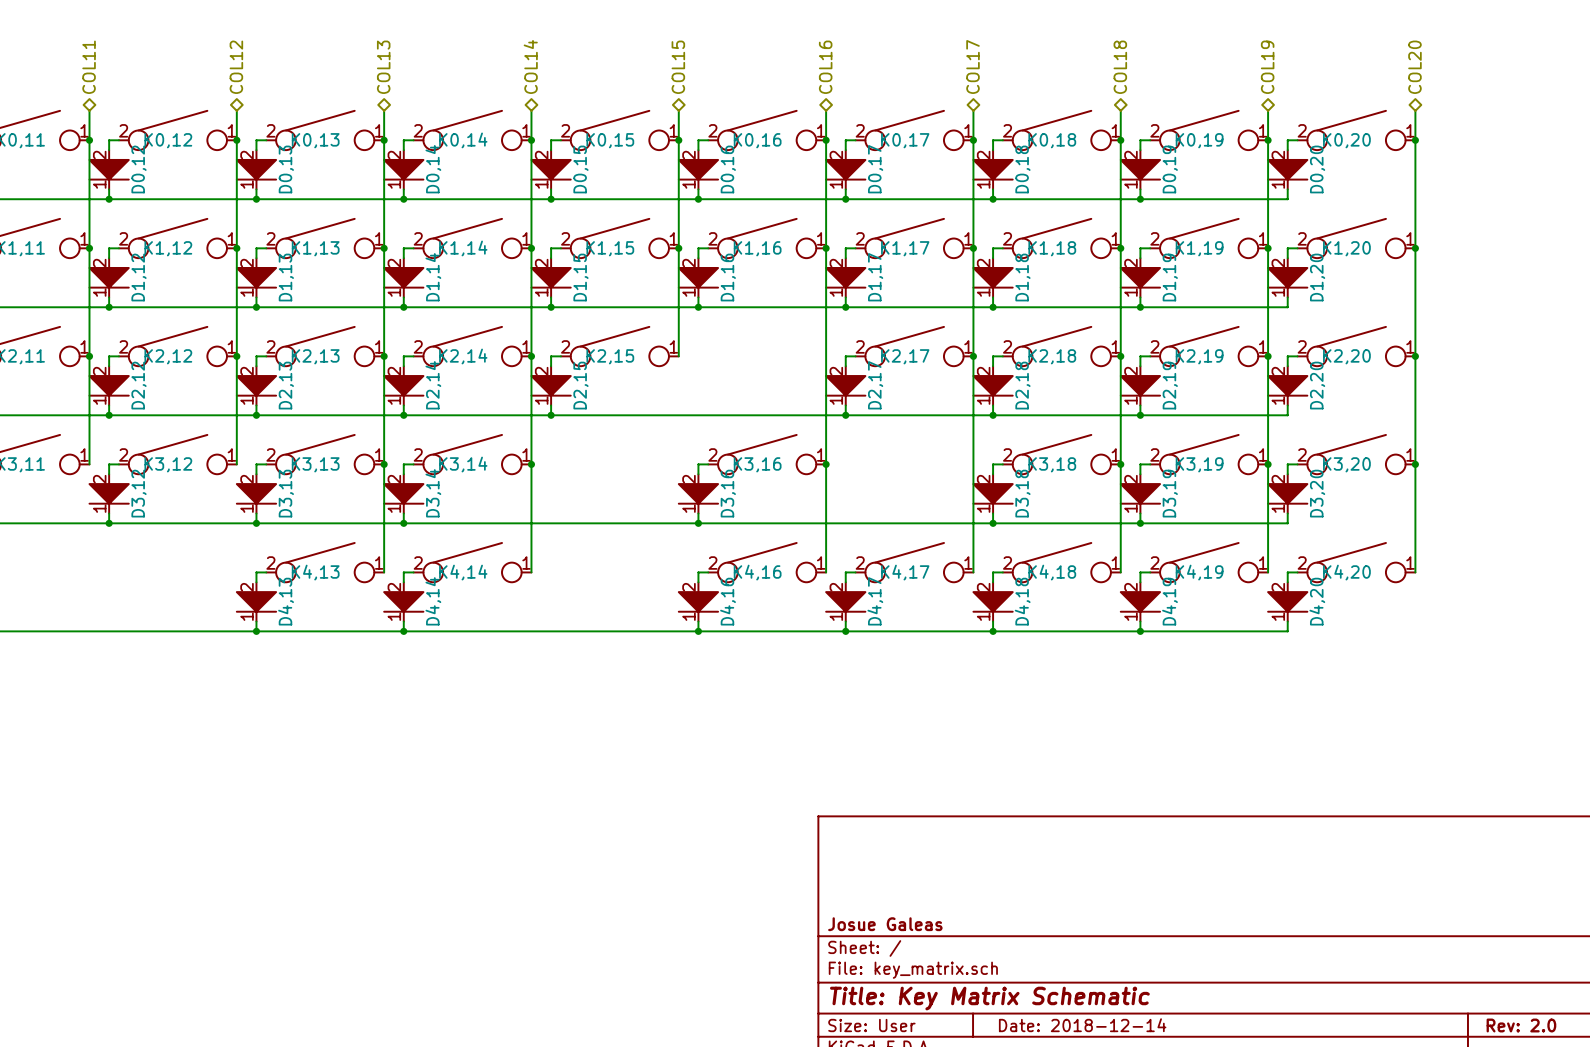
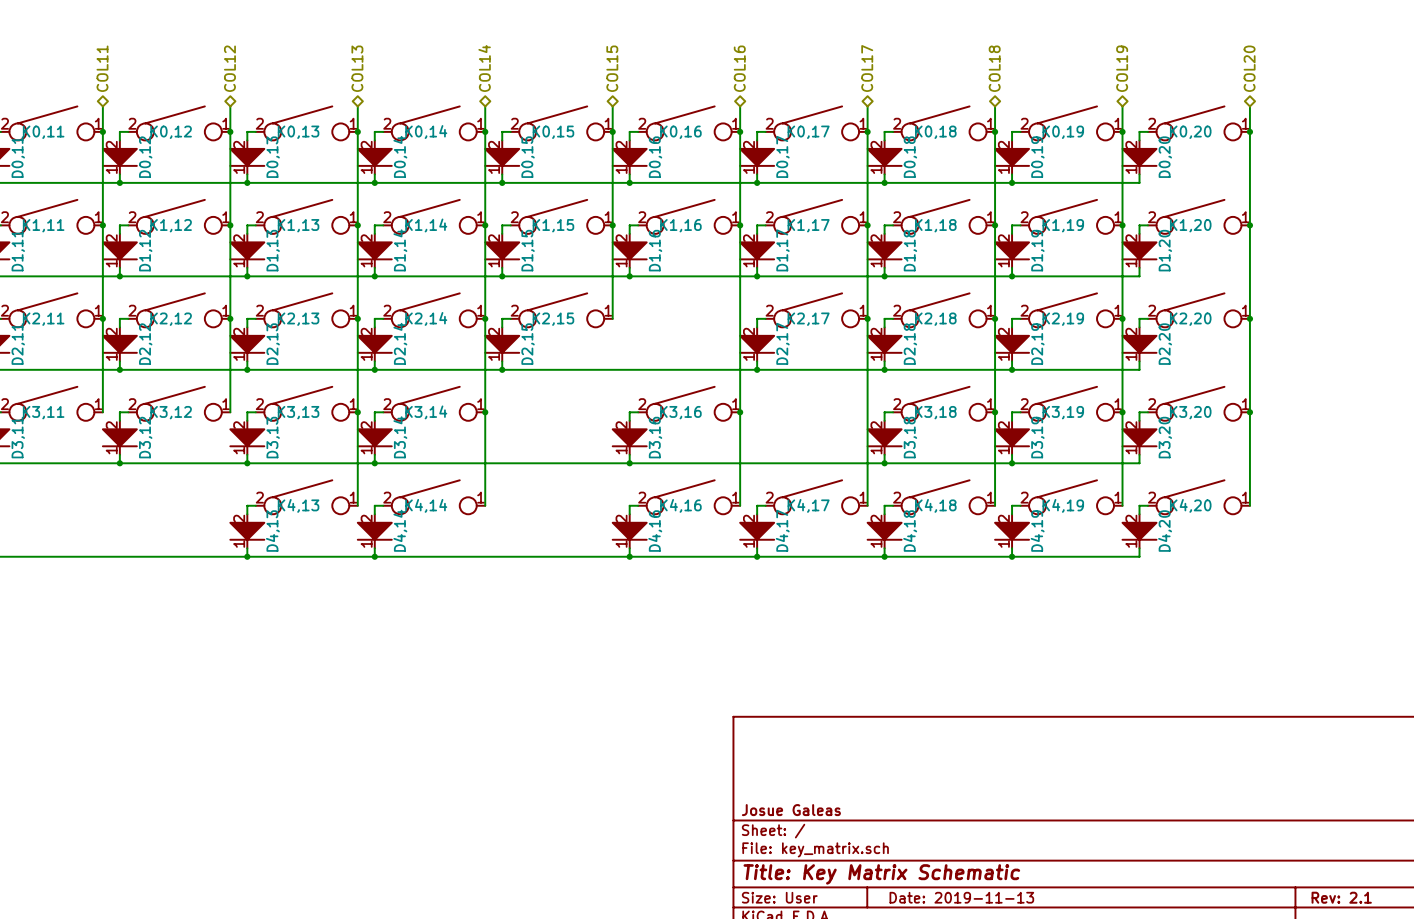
title block: Date: 2018-12-14 (1082, 1025) -> Date: 2019-11-13 (961, 897)
title block: Rev: 2.0 (1521, 1025) -> Rev: 2.1 (1341, 897)

